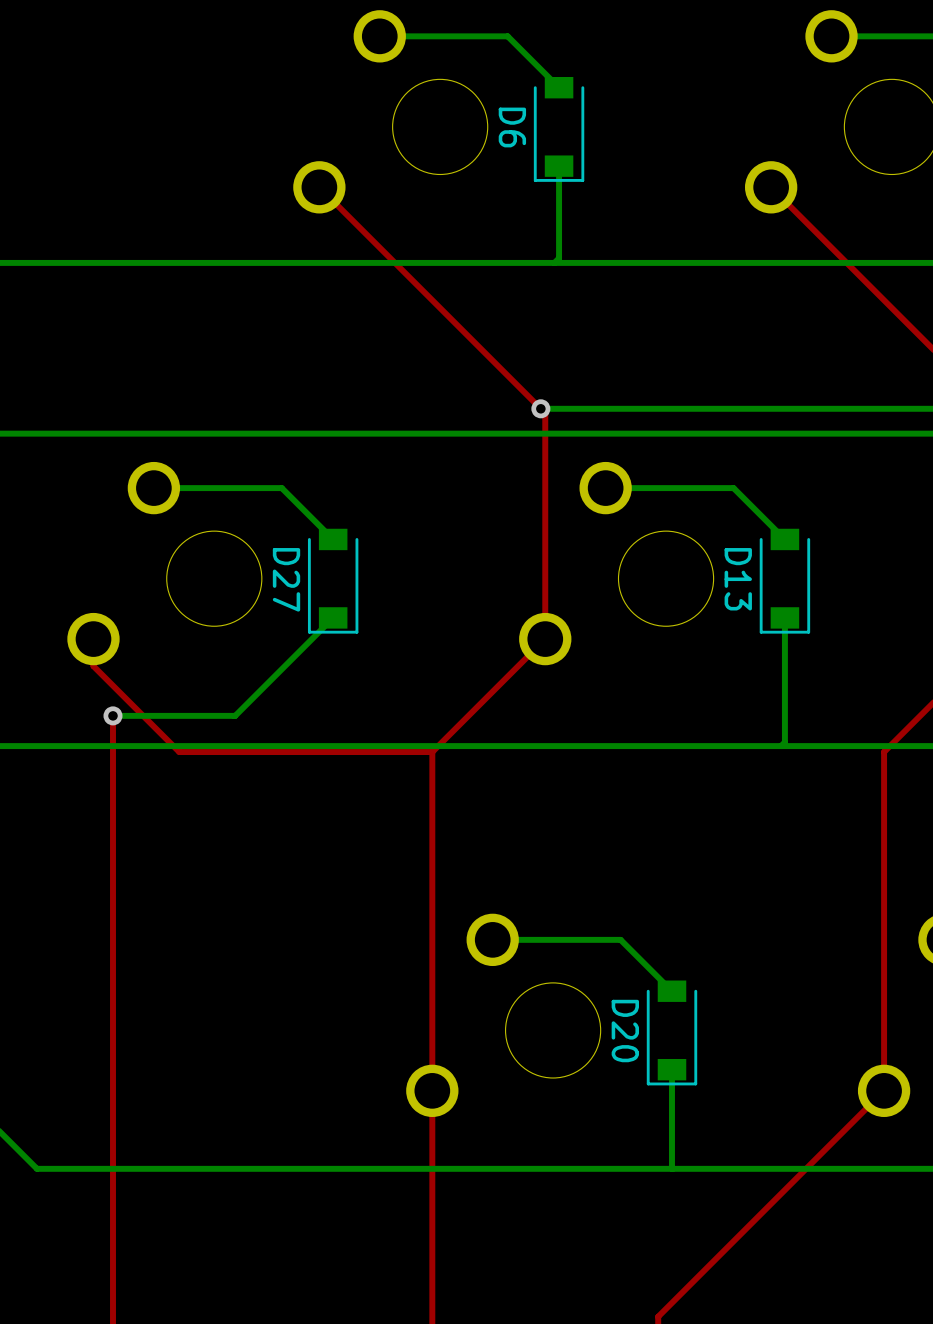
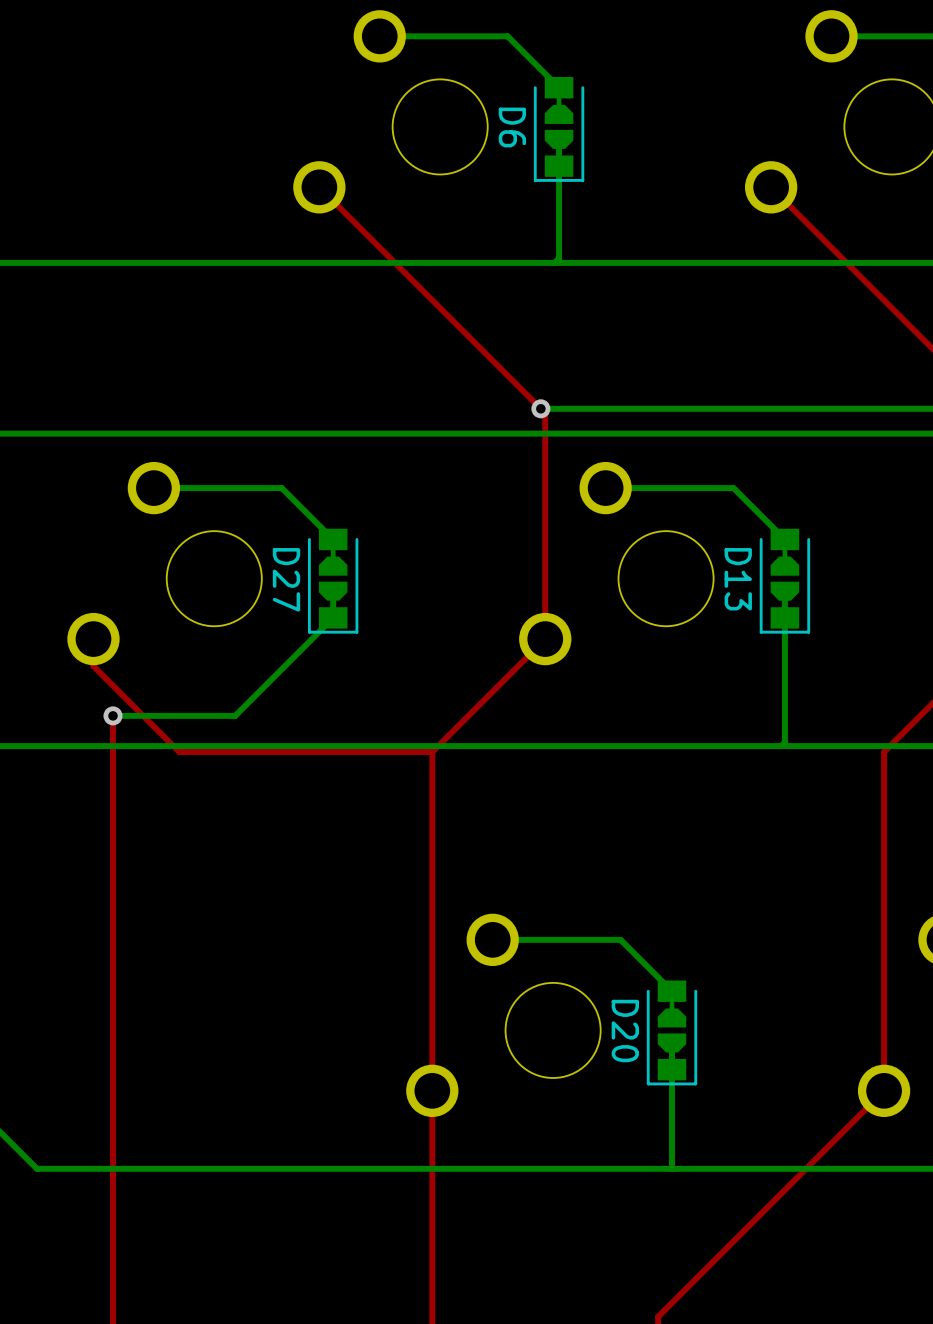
D6 footprint: [533, 76, 585, 182] -> [533, 76, 585, 182]
D27 footprint: [307, 528, 359, 634] -> [307, 528, 359, 634]
D13 footprint: [759, 528, 811, 634] -> [759, 528, 811, 634]
D20 footprint: [646, 980, 698, 1086] -> [646, 980, 698, 1086]

